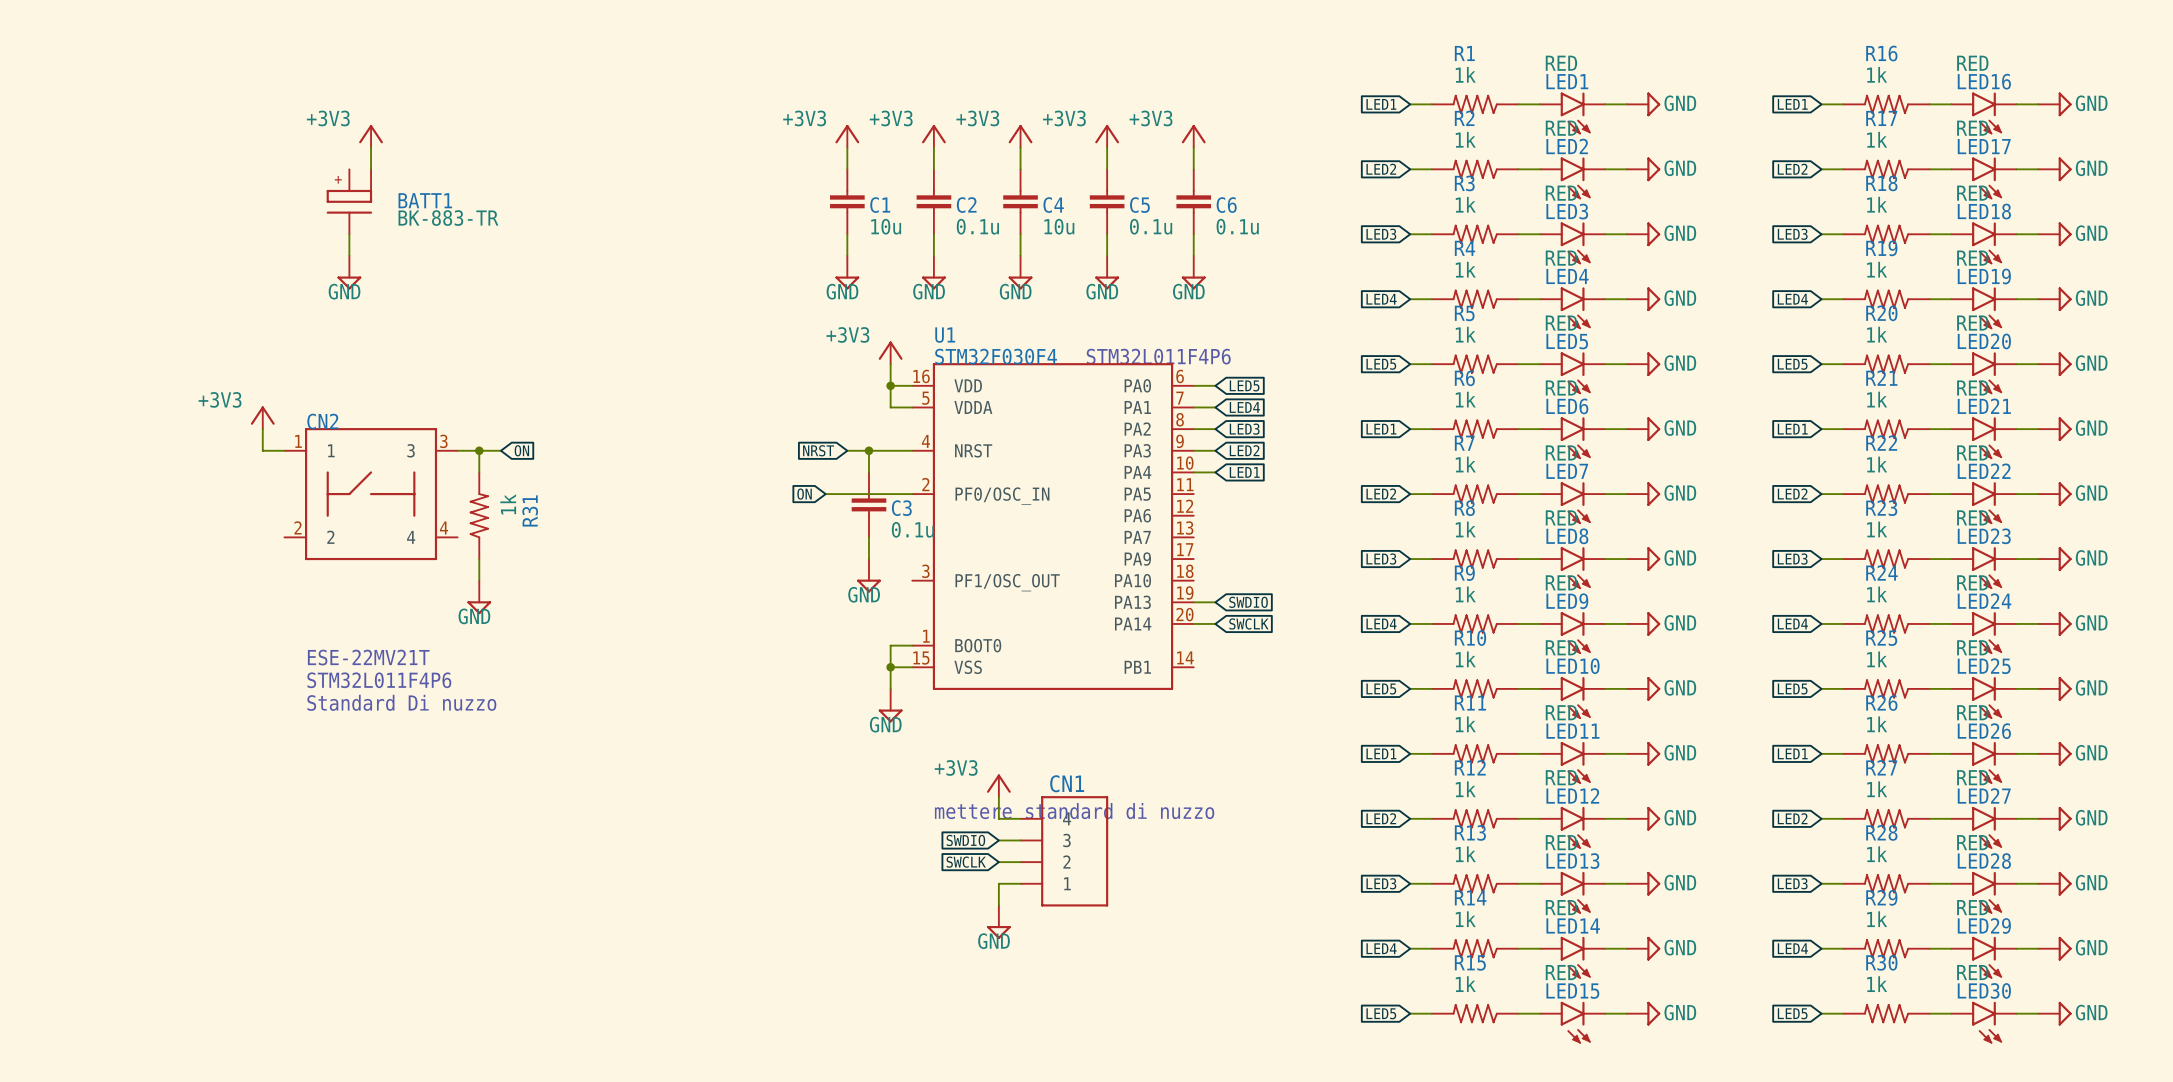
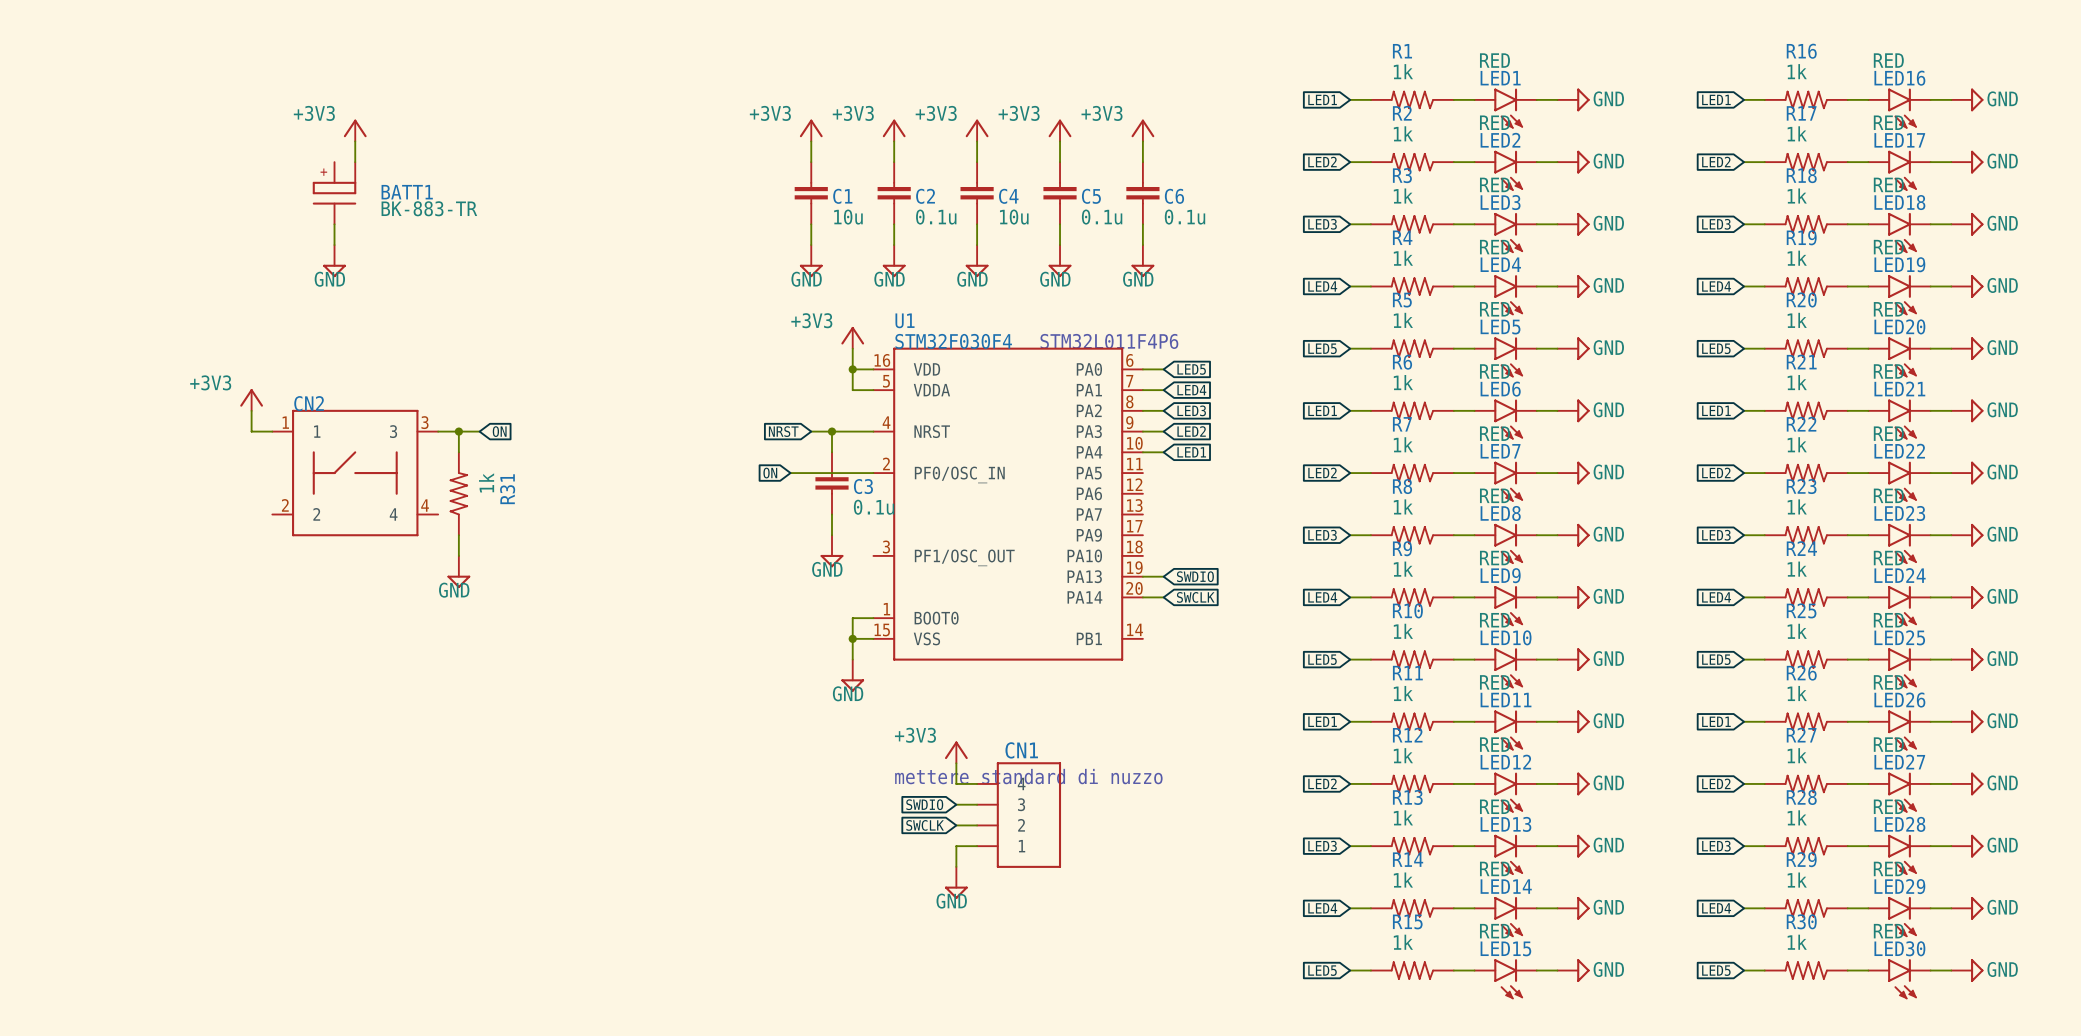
text: ESE-22MV21T (368, 657) -> none
text: STM32L011F4P6 (379, 680) -> none
text: Standard Di nuzzo (401, 702) -> none

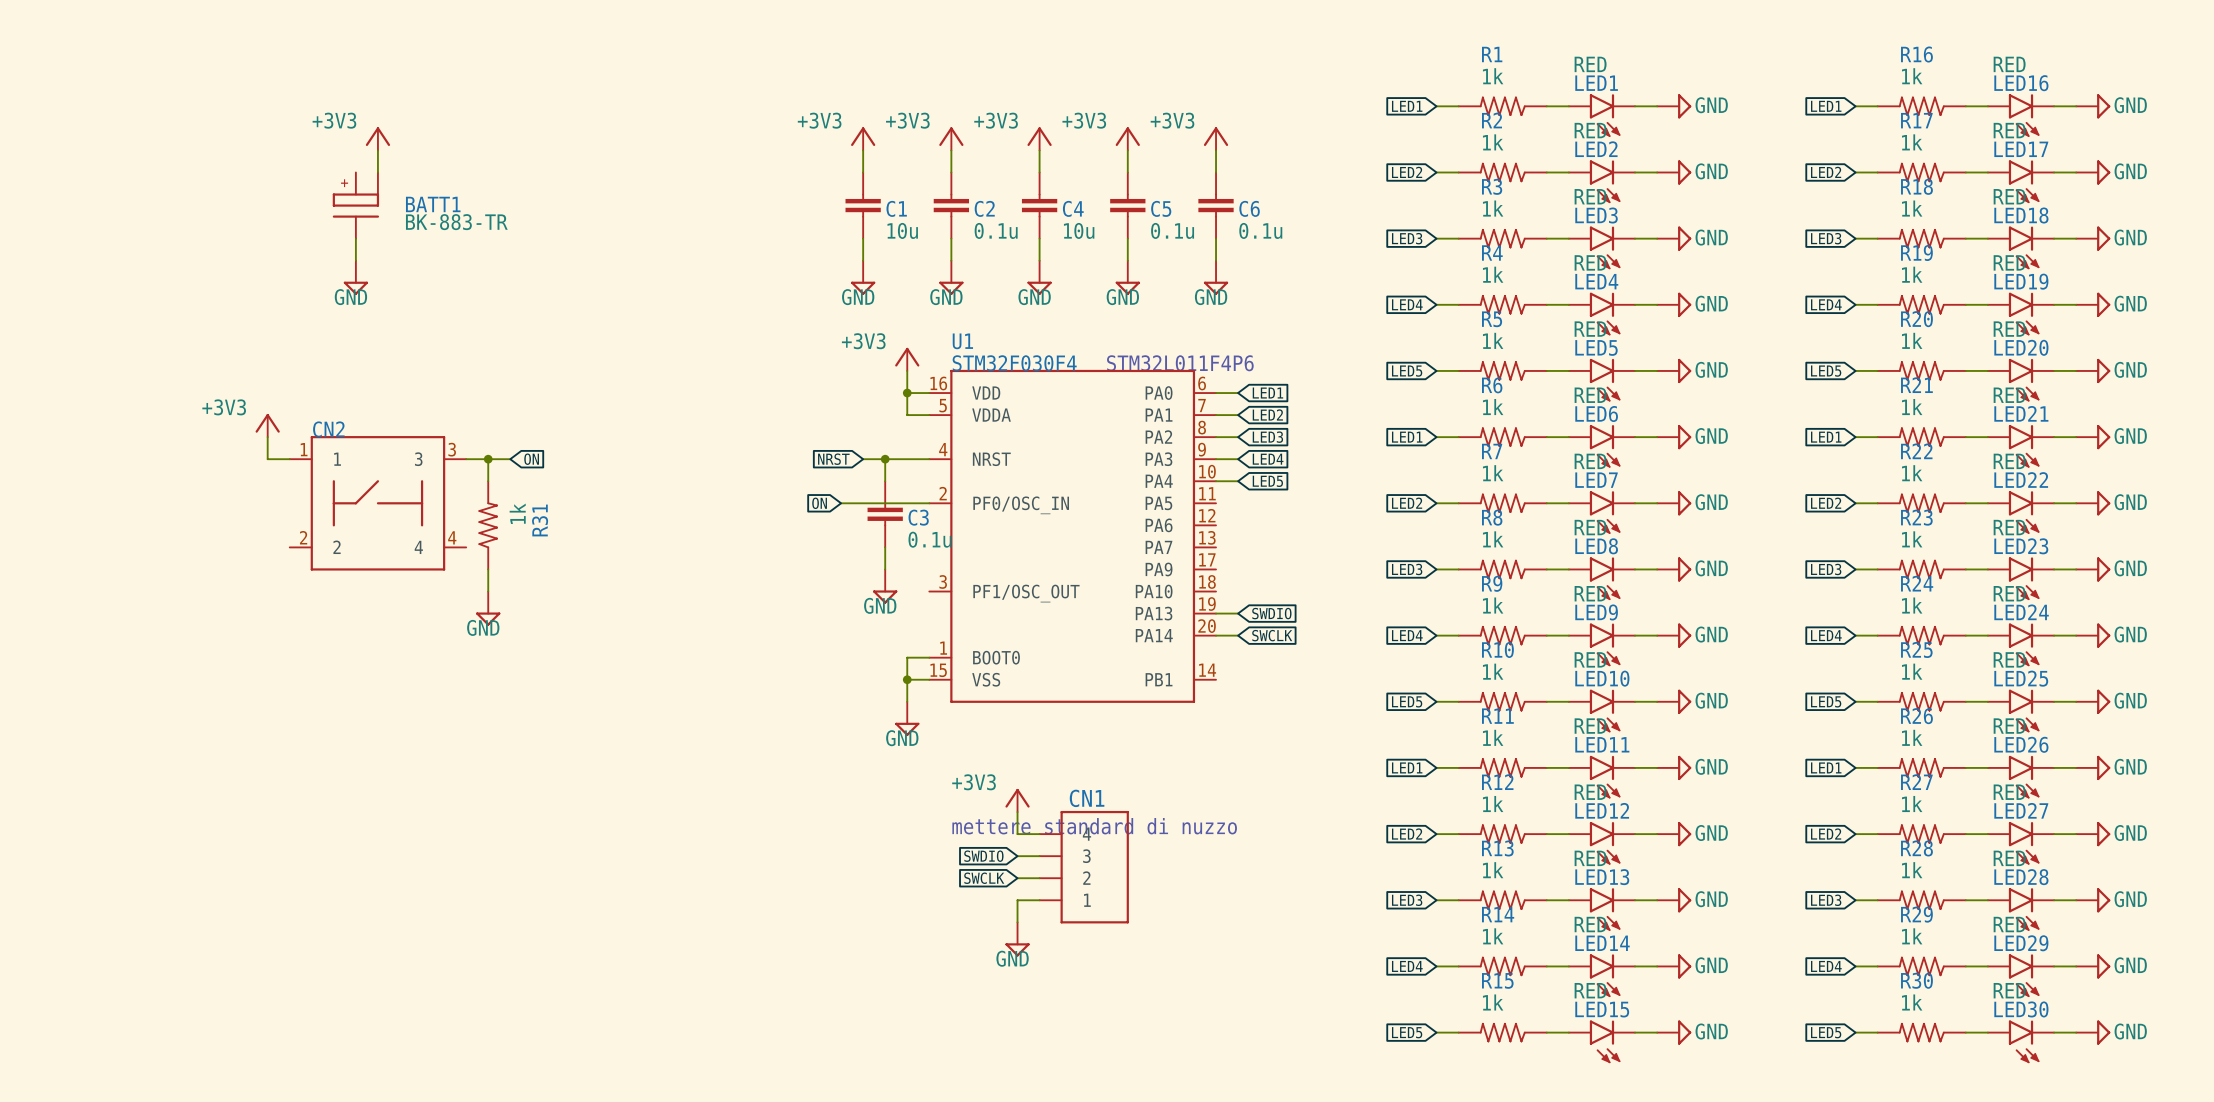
global label: LED5 (1191, 369) -> LED1 (1267, 393)
global label: LED4 (1191, 390) -> LED2 (1267, 414)
global label: LED2 (1191, 431) -> LED4 (1268, 459)
global label: LED1 (1191, 452) -> LED5 (1267, 481)

